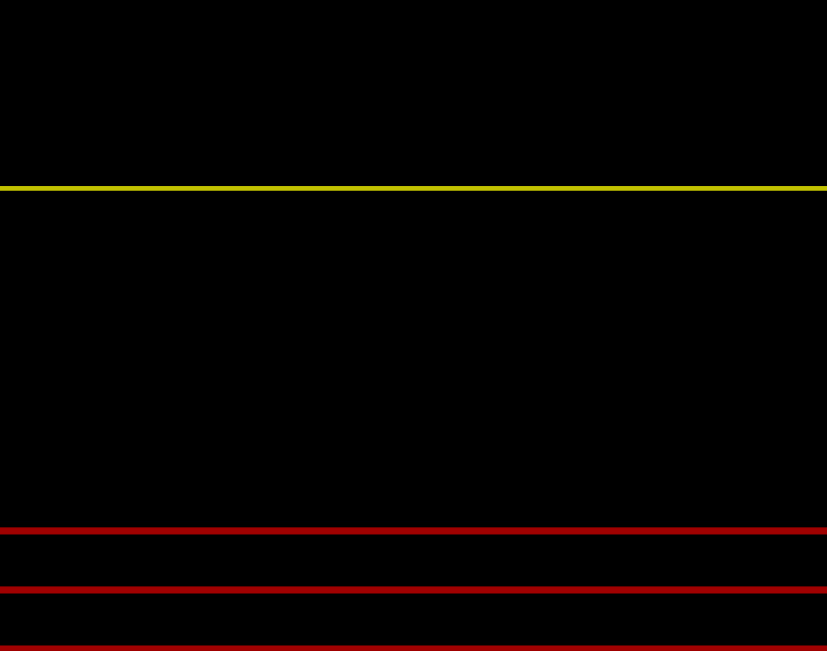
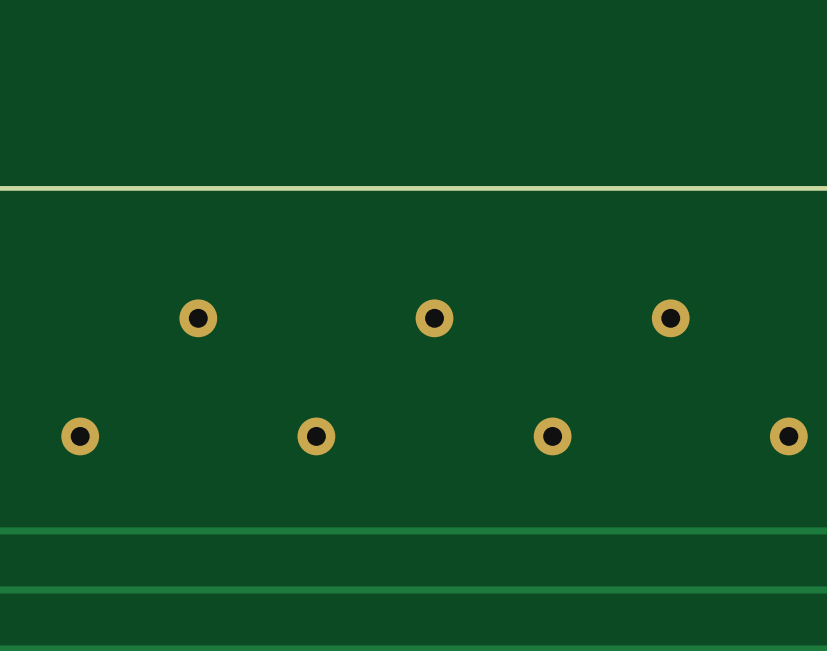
via: none -> (198, 318)
via: none -> (434, 318)
via: none -> (670, 318)
via: none -> (80, 436)
via: none -> (316, 436)
via: none -> (552, 436)
via: none -> (788, 436)

